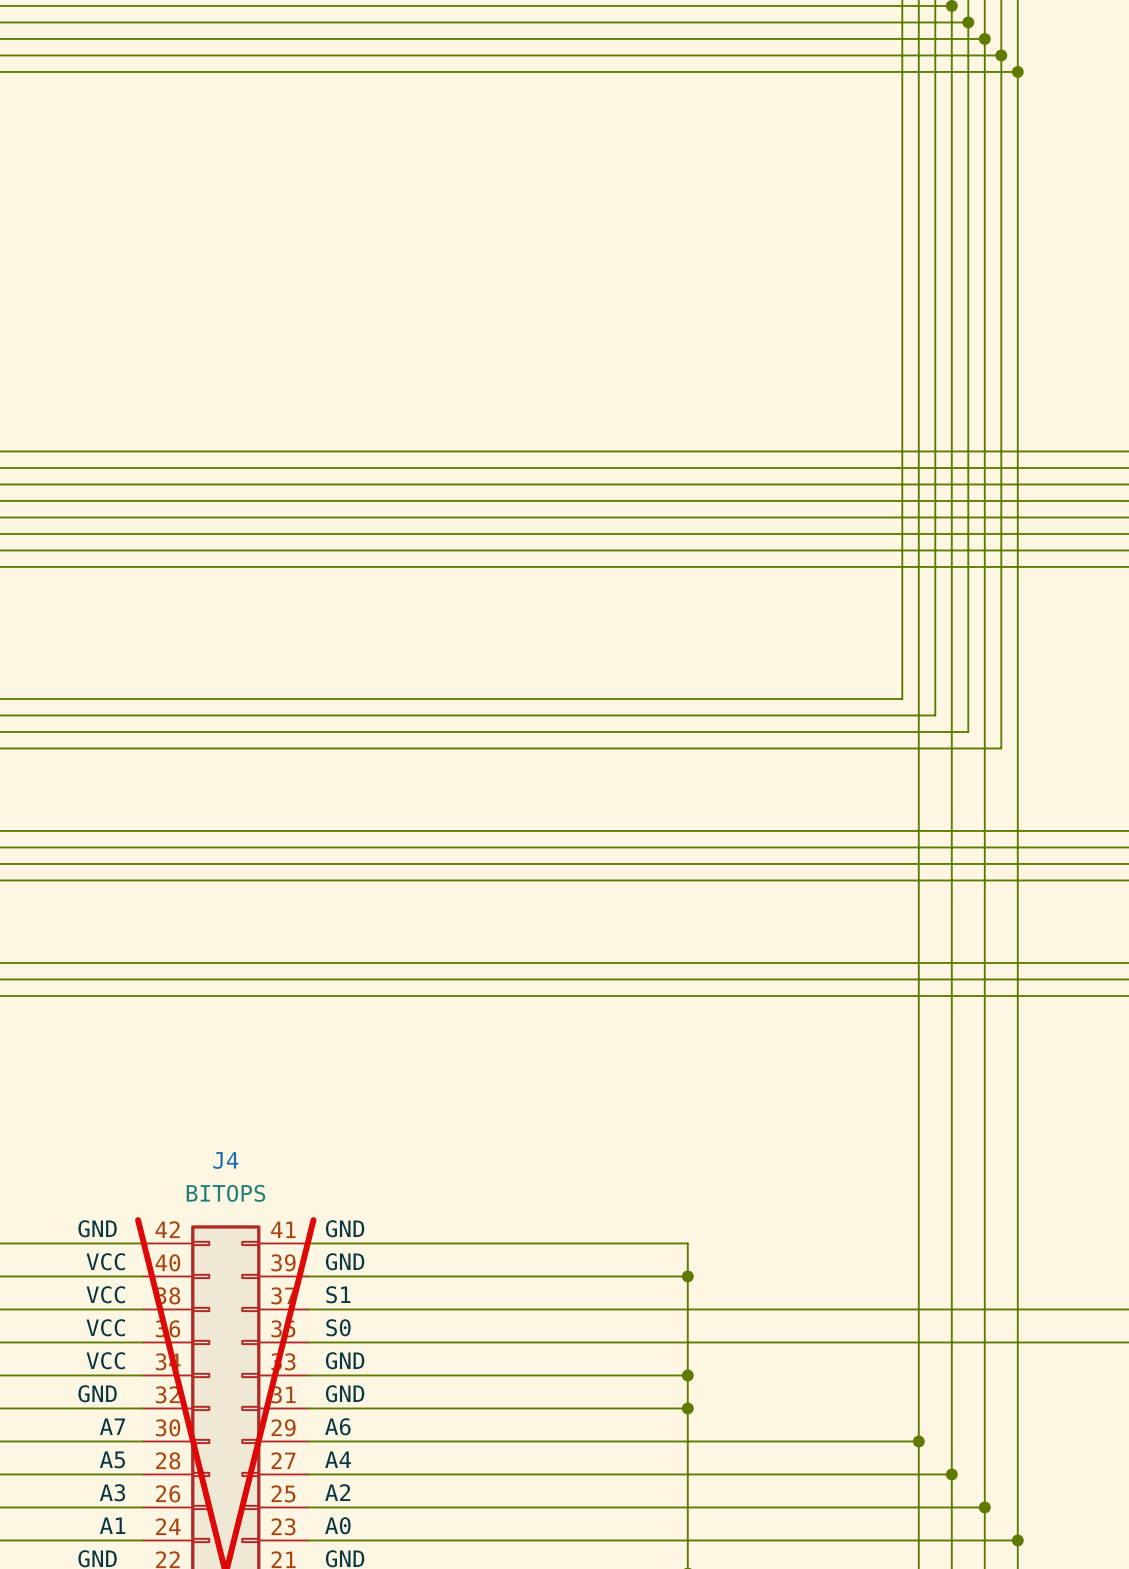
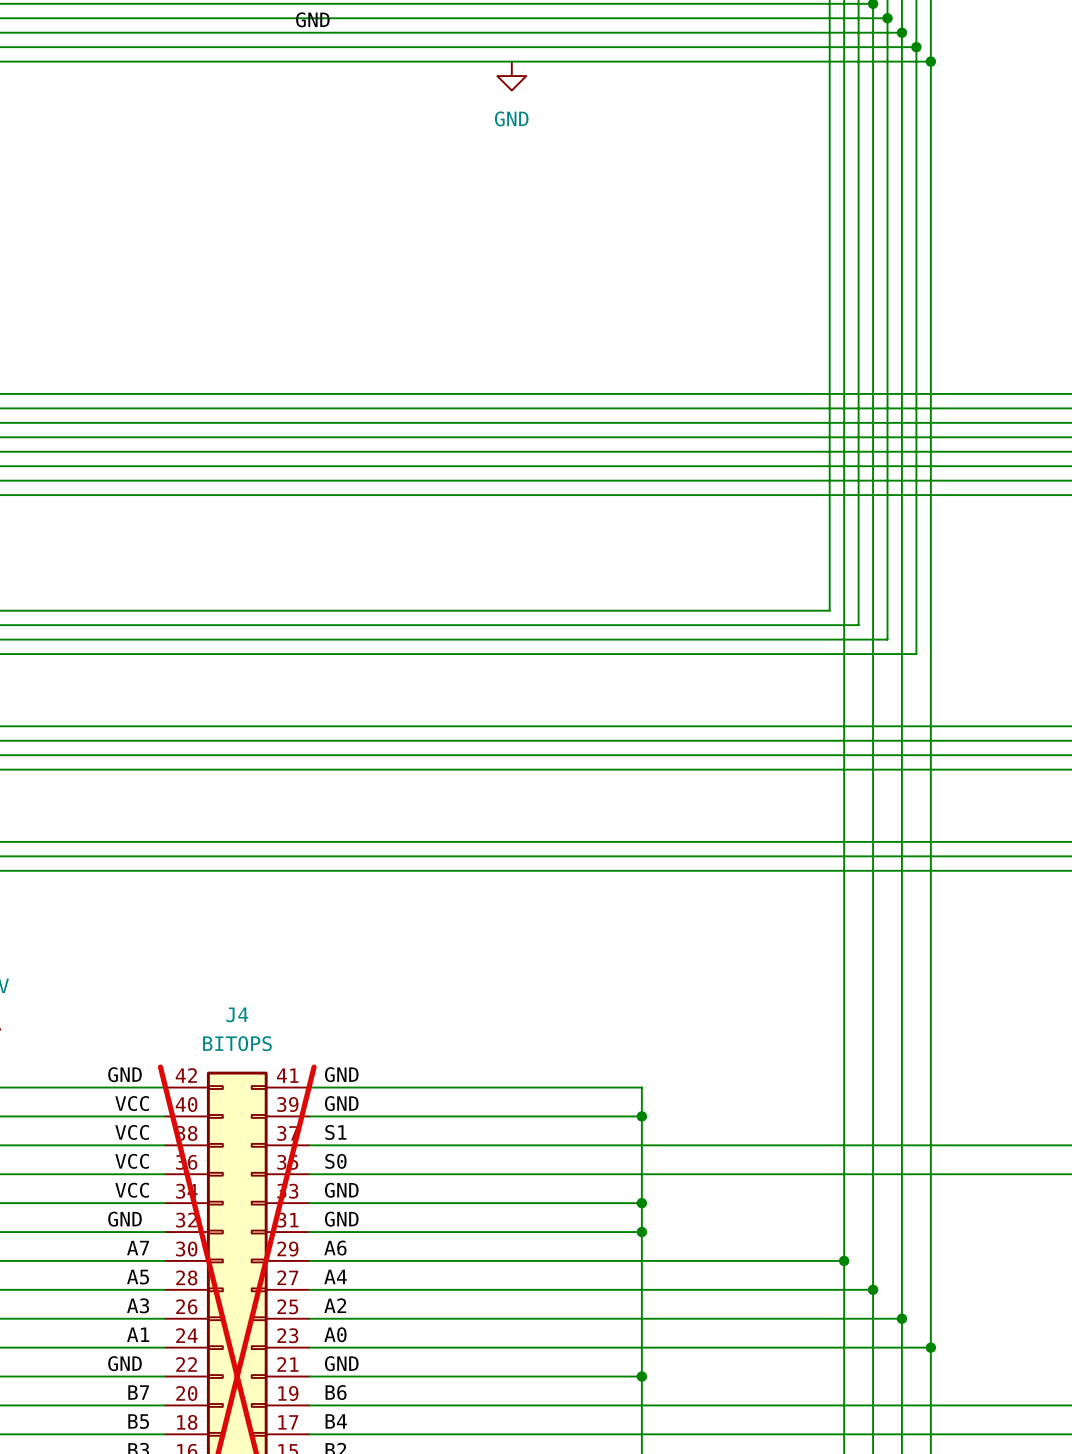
label: none -> GND (312, 19)
power symbol: none -> GND (511, 76)

